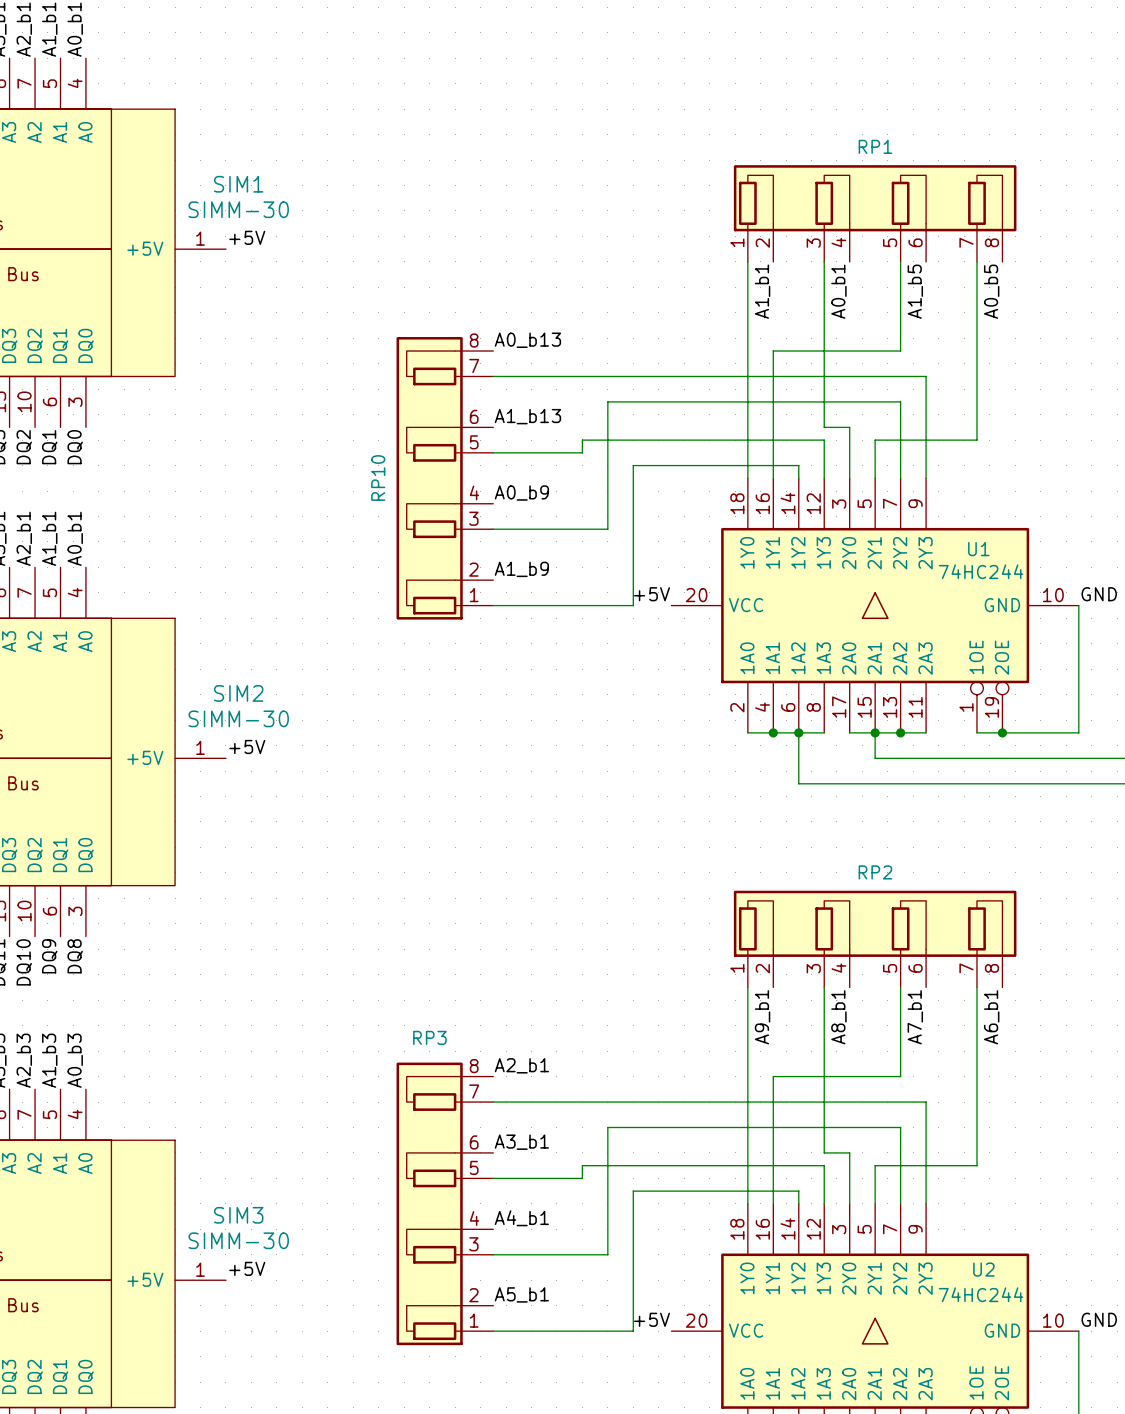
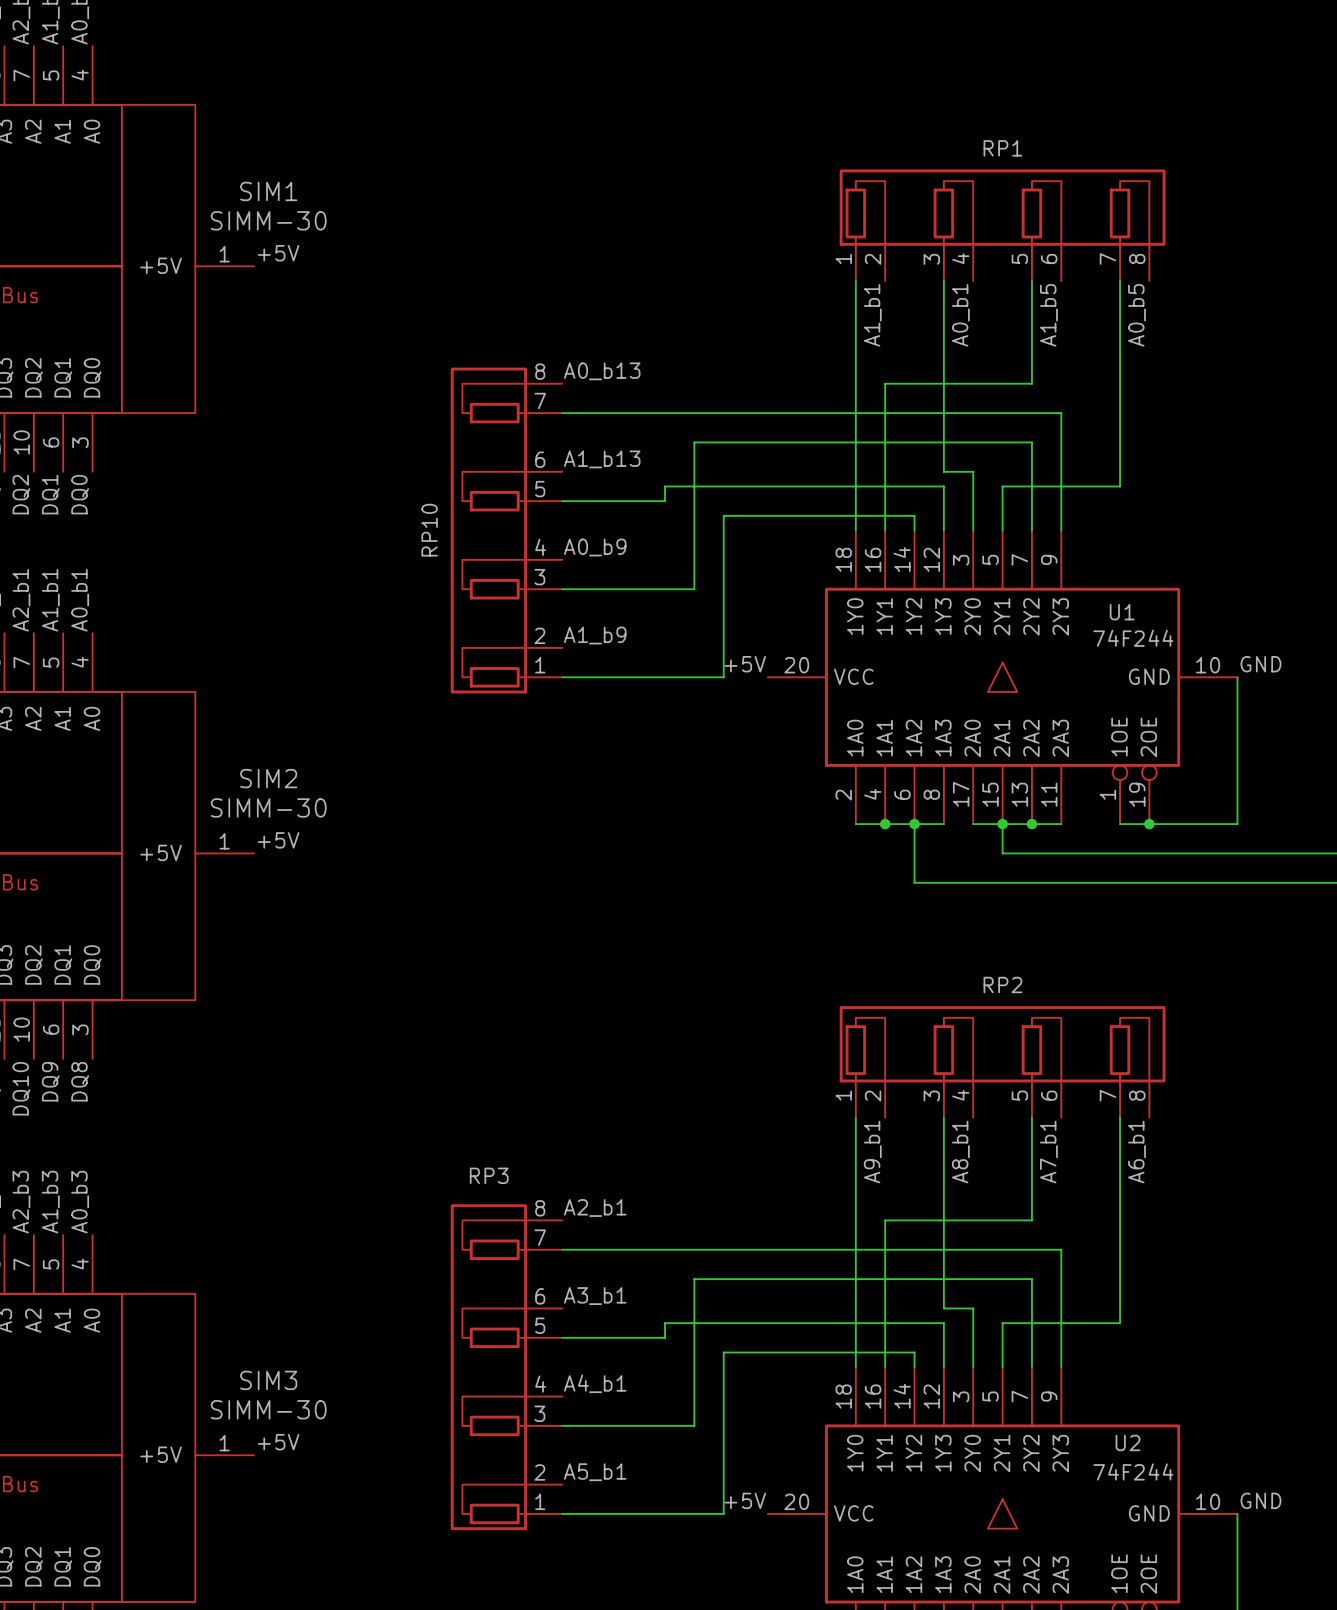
U1 value: 74HC244 (981, 571) -> 74F244 (1133, 638)
U2 value: 74HC244 (981, 1294) -> 74F244 (1133, 1471)

